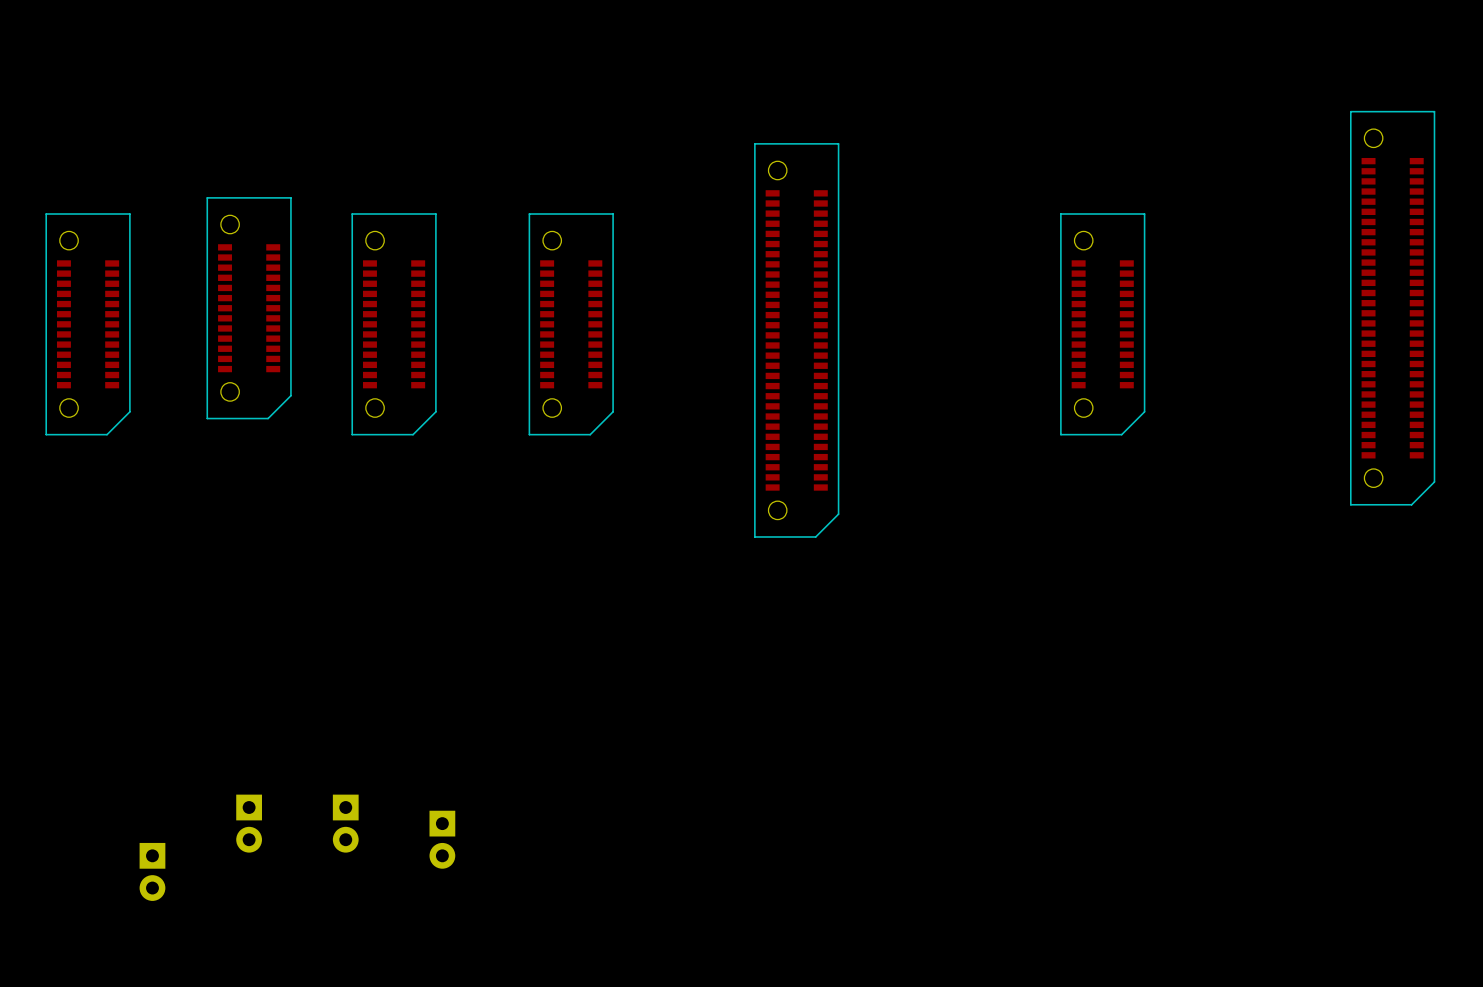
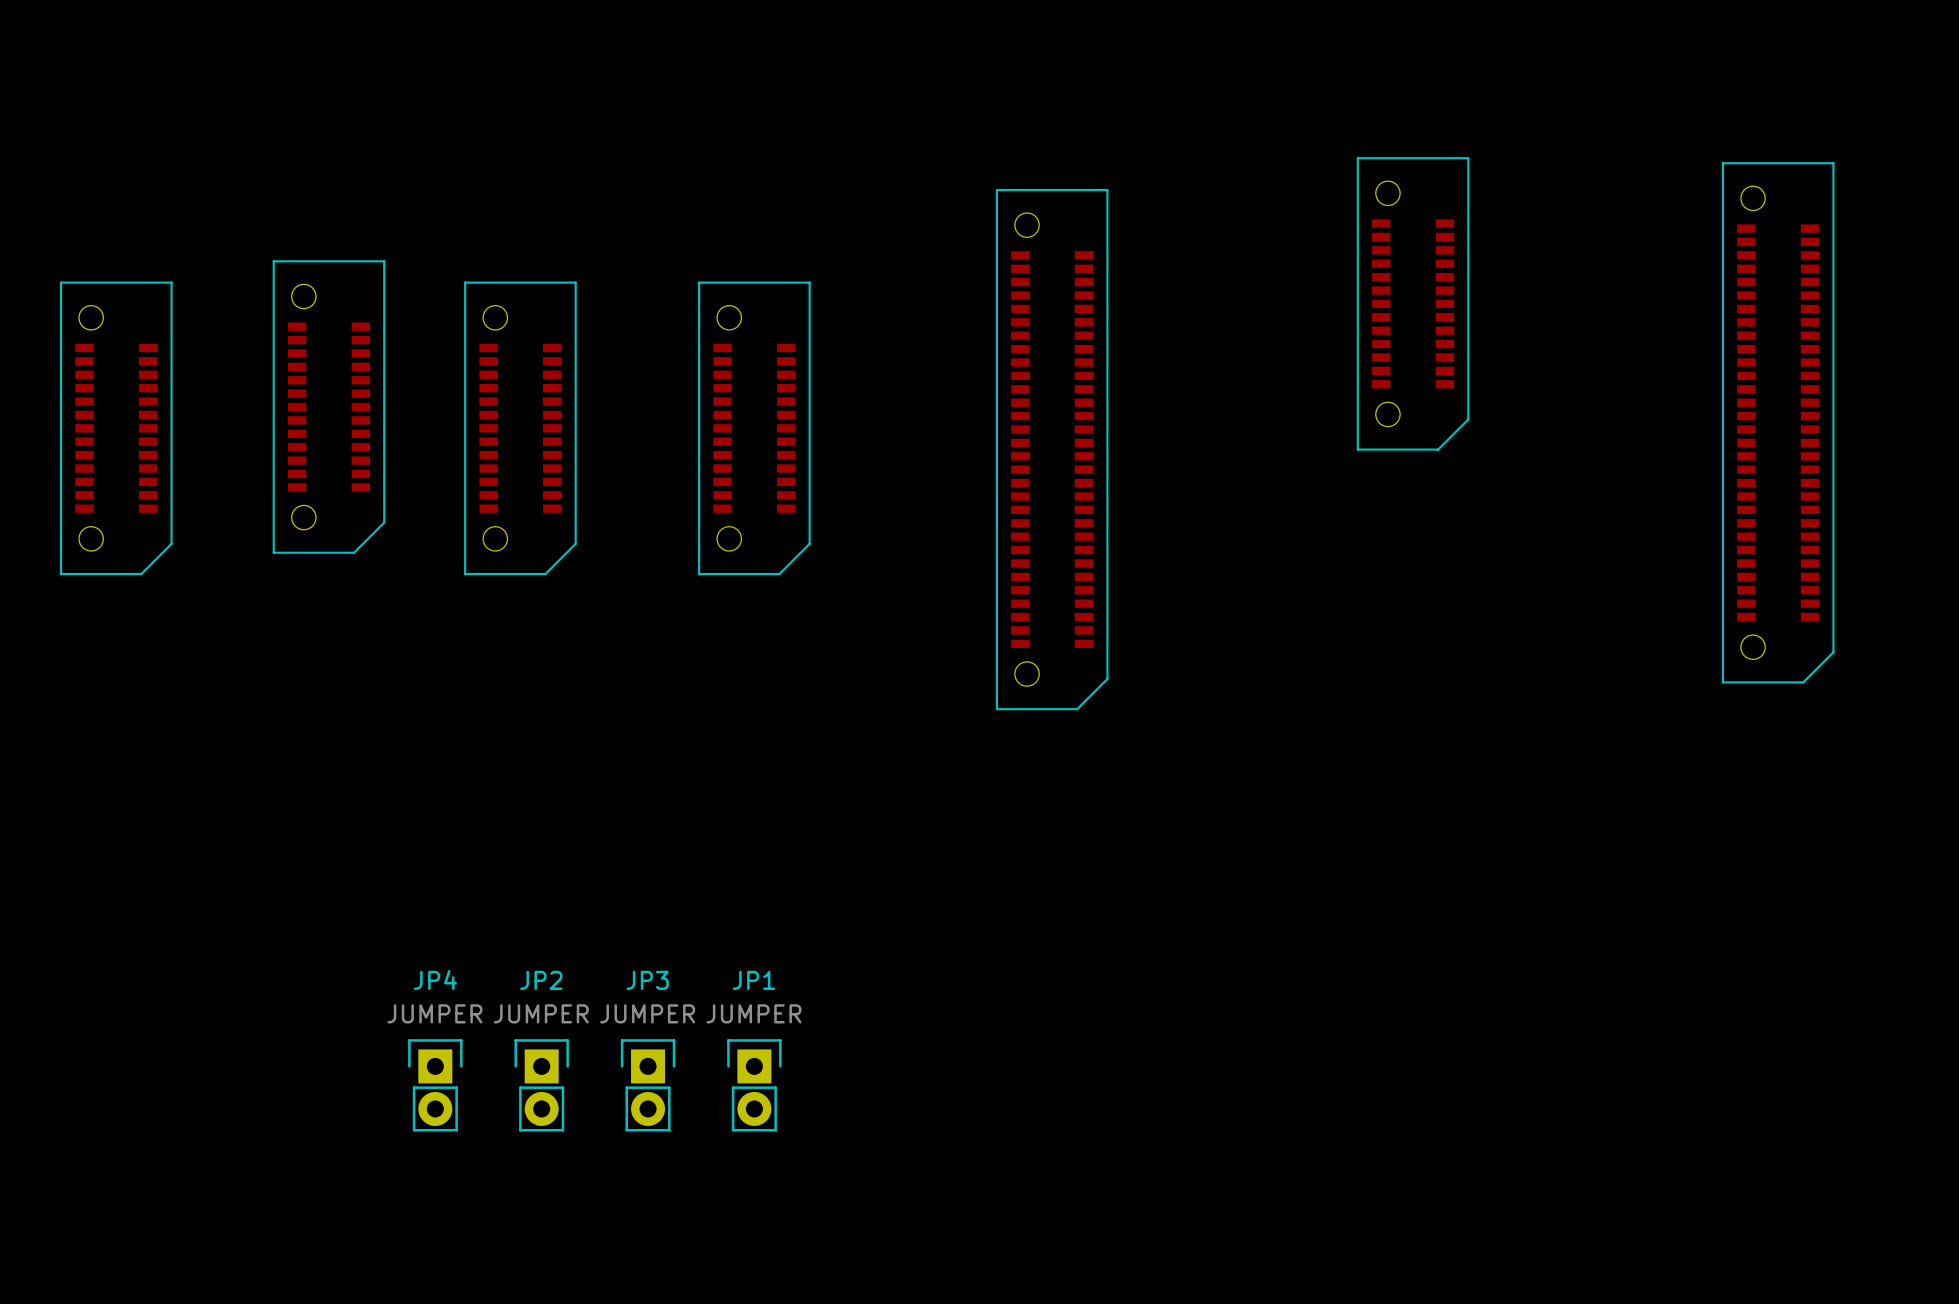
part position: (1392, 308) -> (1778, 422)
part position: (1102, 324) -> (1413, 303)
JP1: none -> JUMPER (754, 1085)
part: (249, 823) -> none
JP2 side: top (345, 823) -> bottom (541, 1085)
JP3 side: top (442, 839) -> bottom (648, 1085)
JP4 side: top (152, 871) -> bottom (435, 1085)

